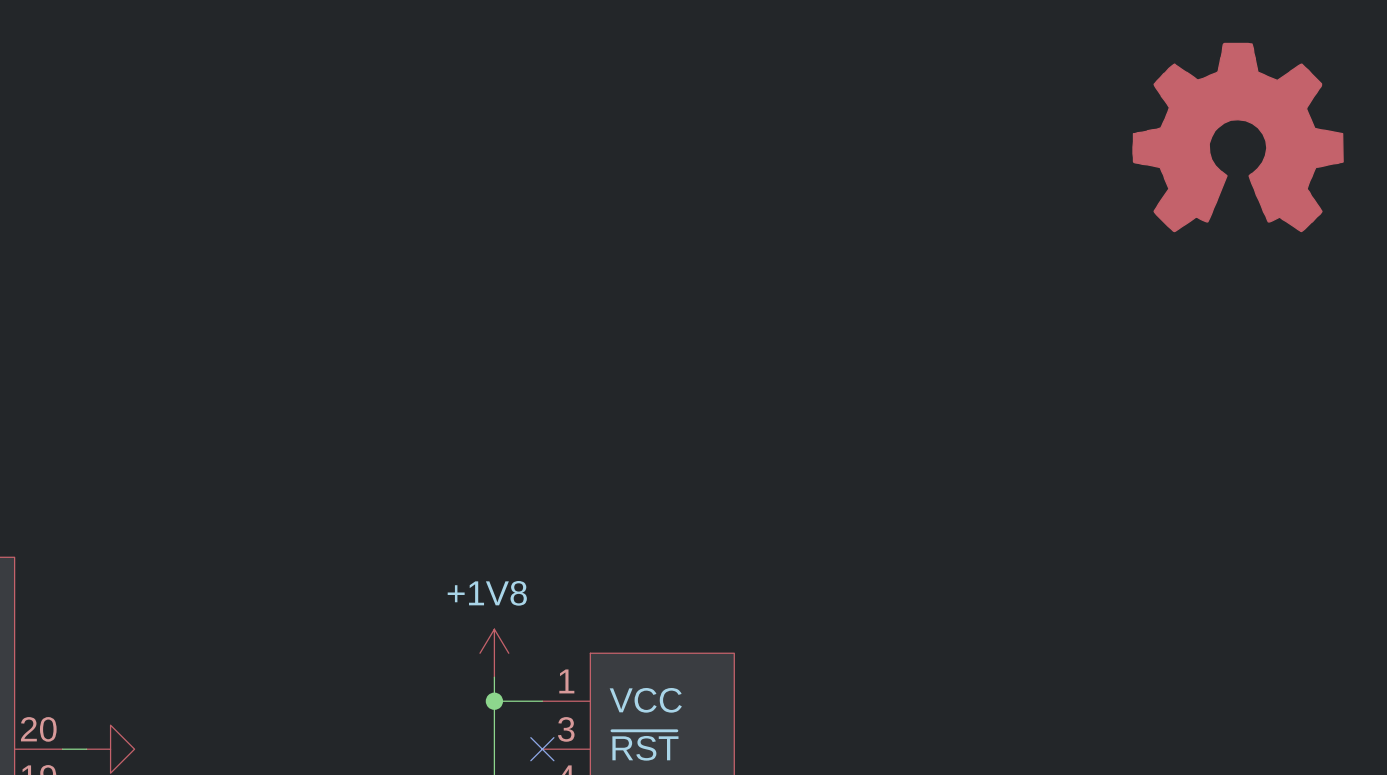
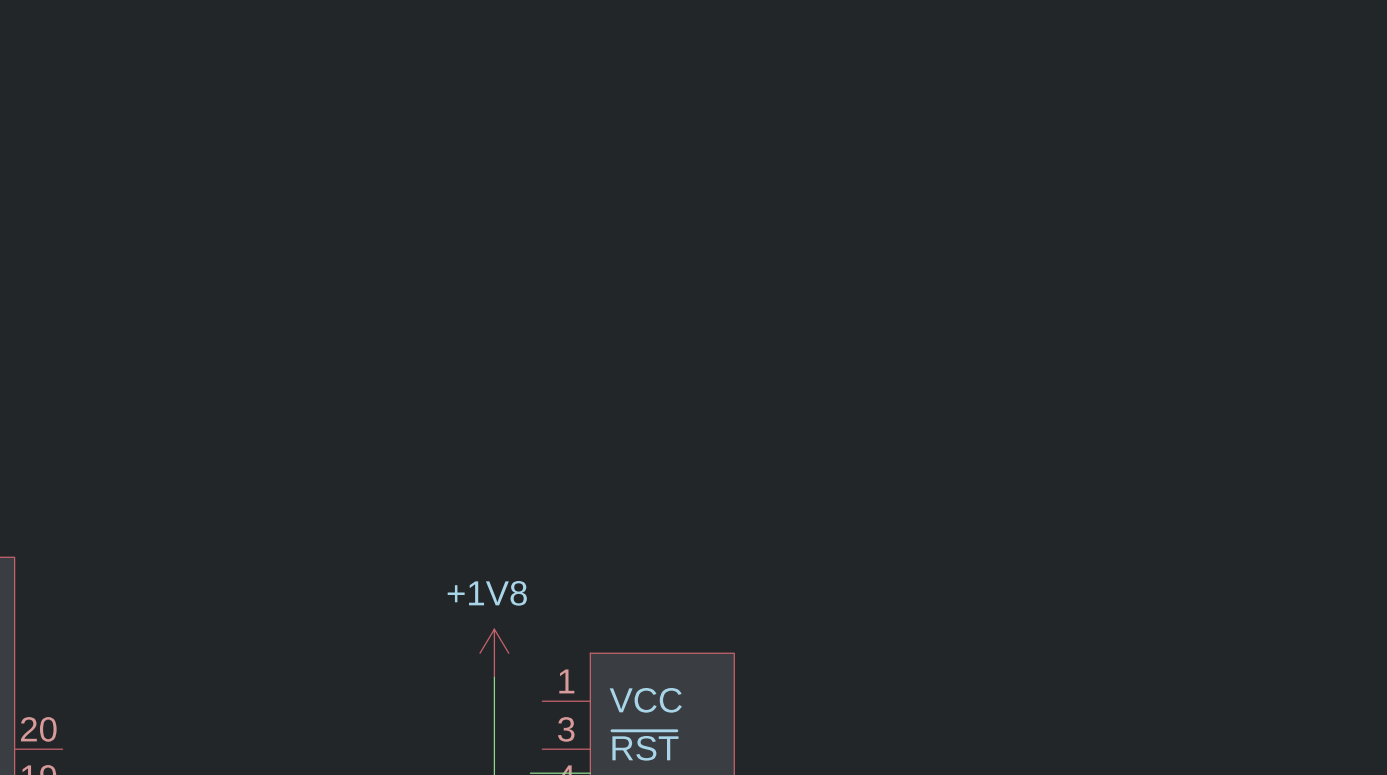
power symbol: (1238, 137) -> none
wire: (494, 701) (542, 701) -> none
junction: (494, 701) -> none
wire: (62, 749) (86, 749) -> none
power symbol: (110, 749) -> none
no-connect mark: (542, 749) -> none
wire: none -> (530, 773) (590, 773)

